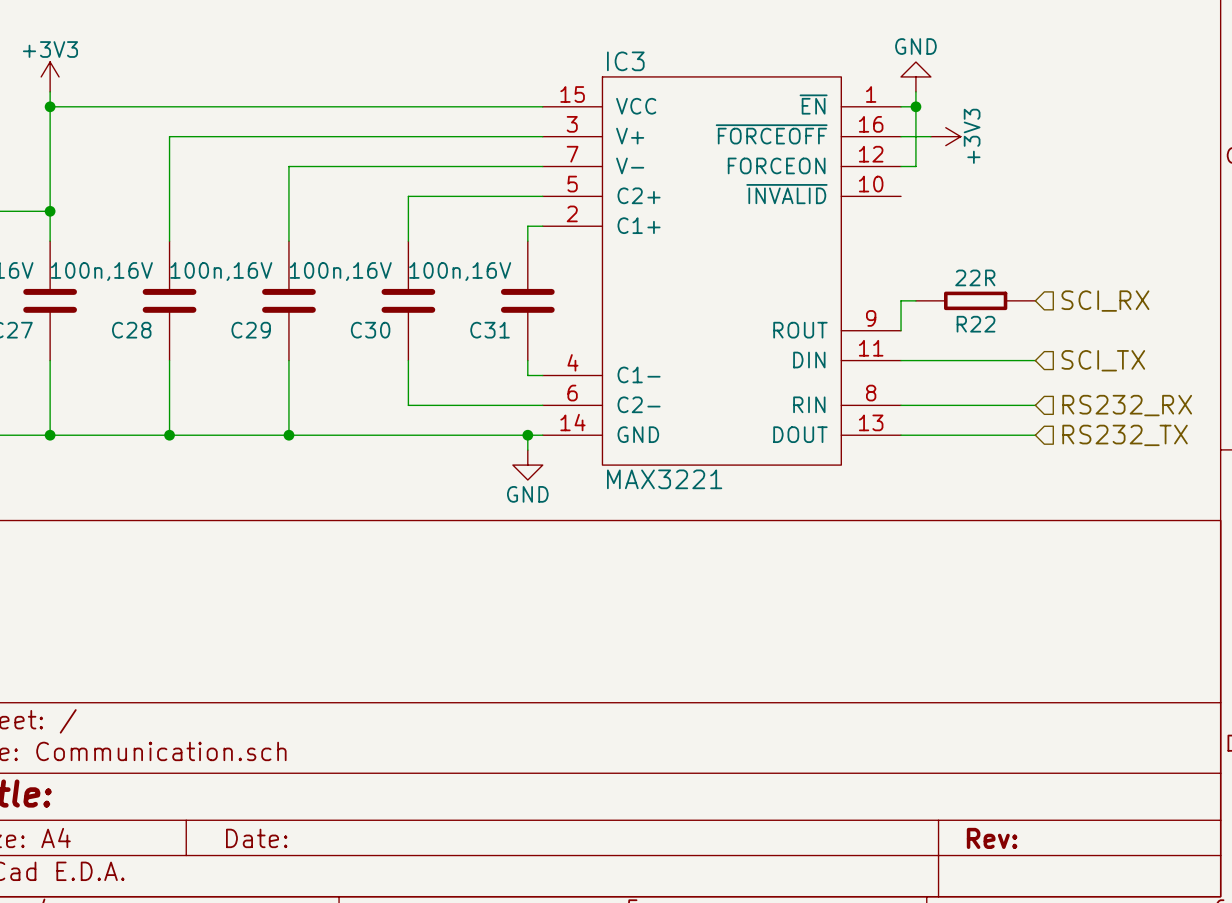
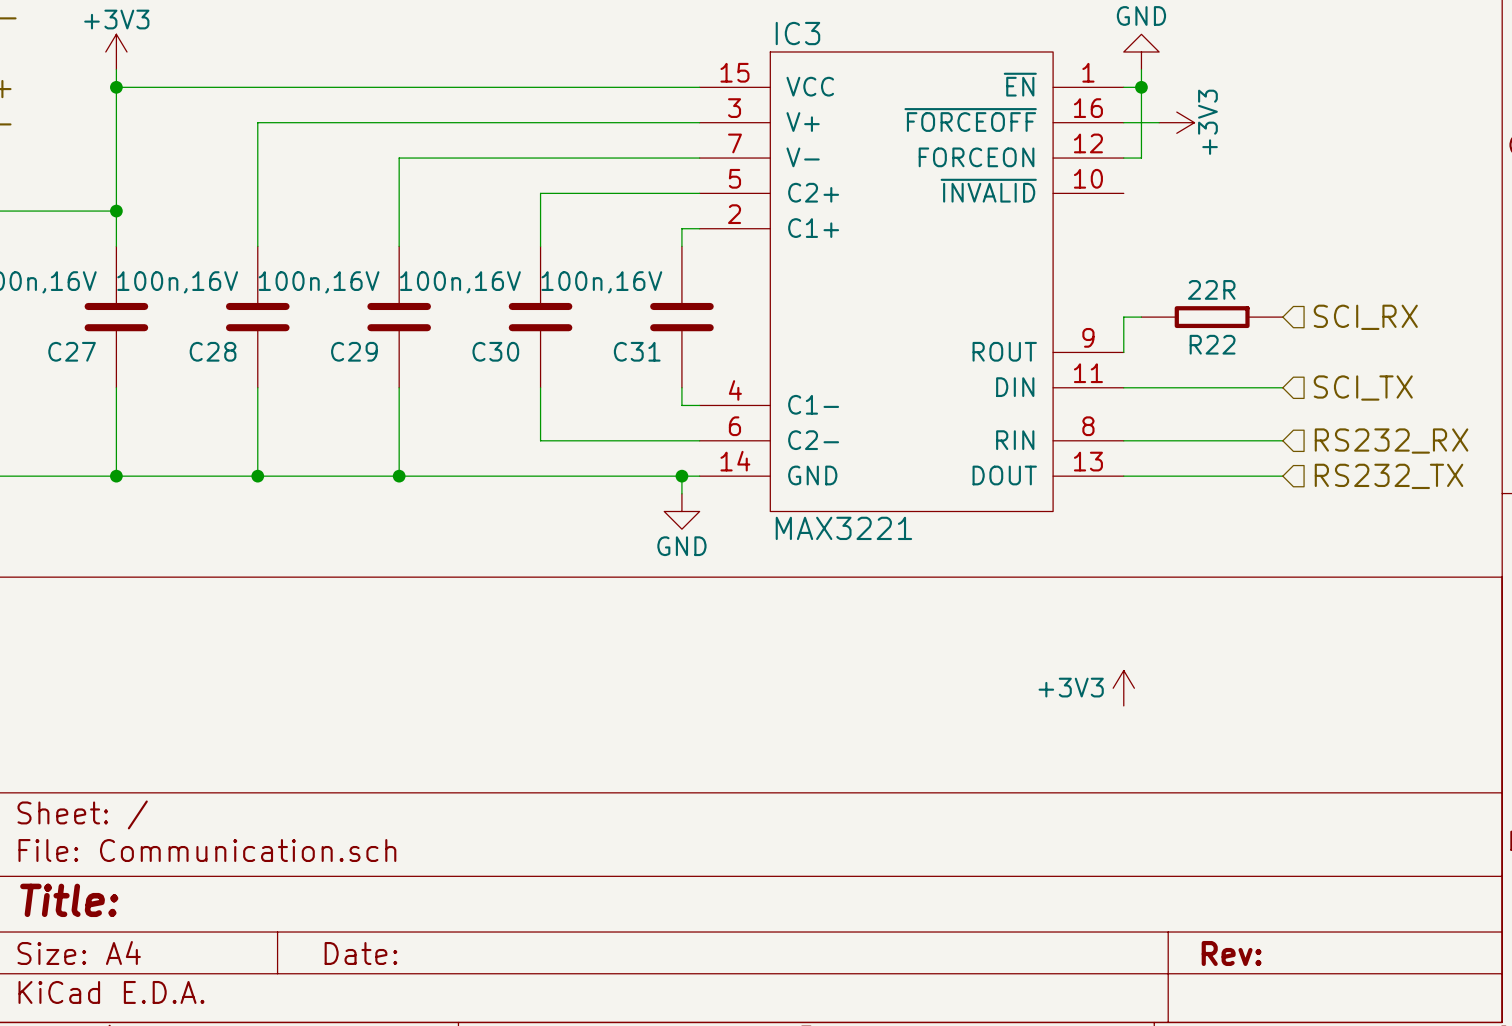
power symbol: none -> +3V3 (1123, 688)

